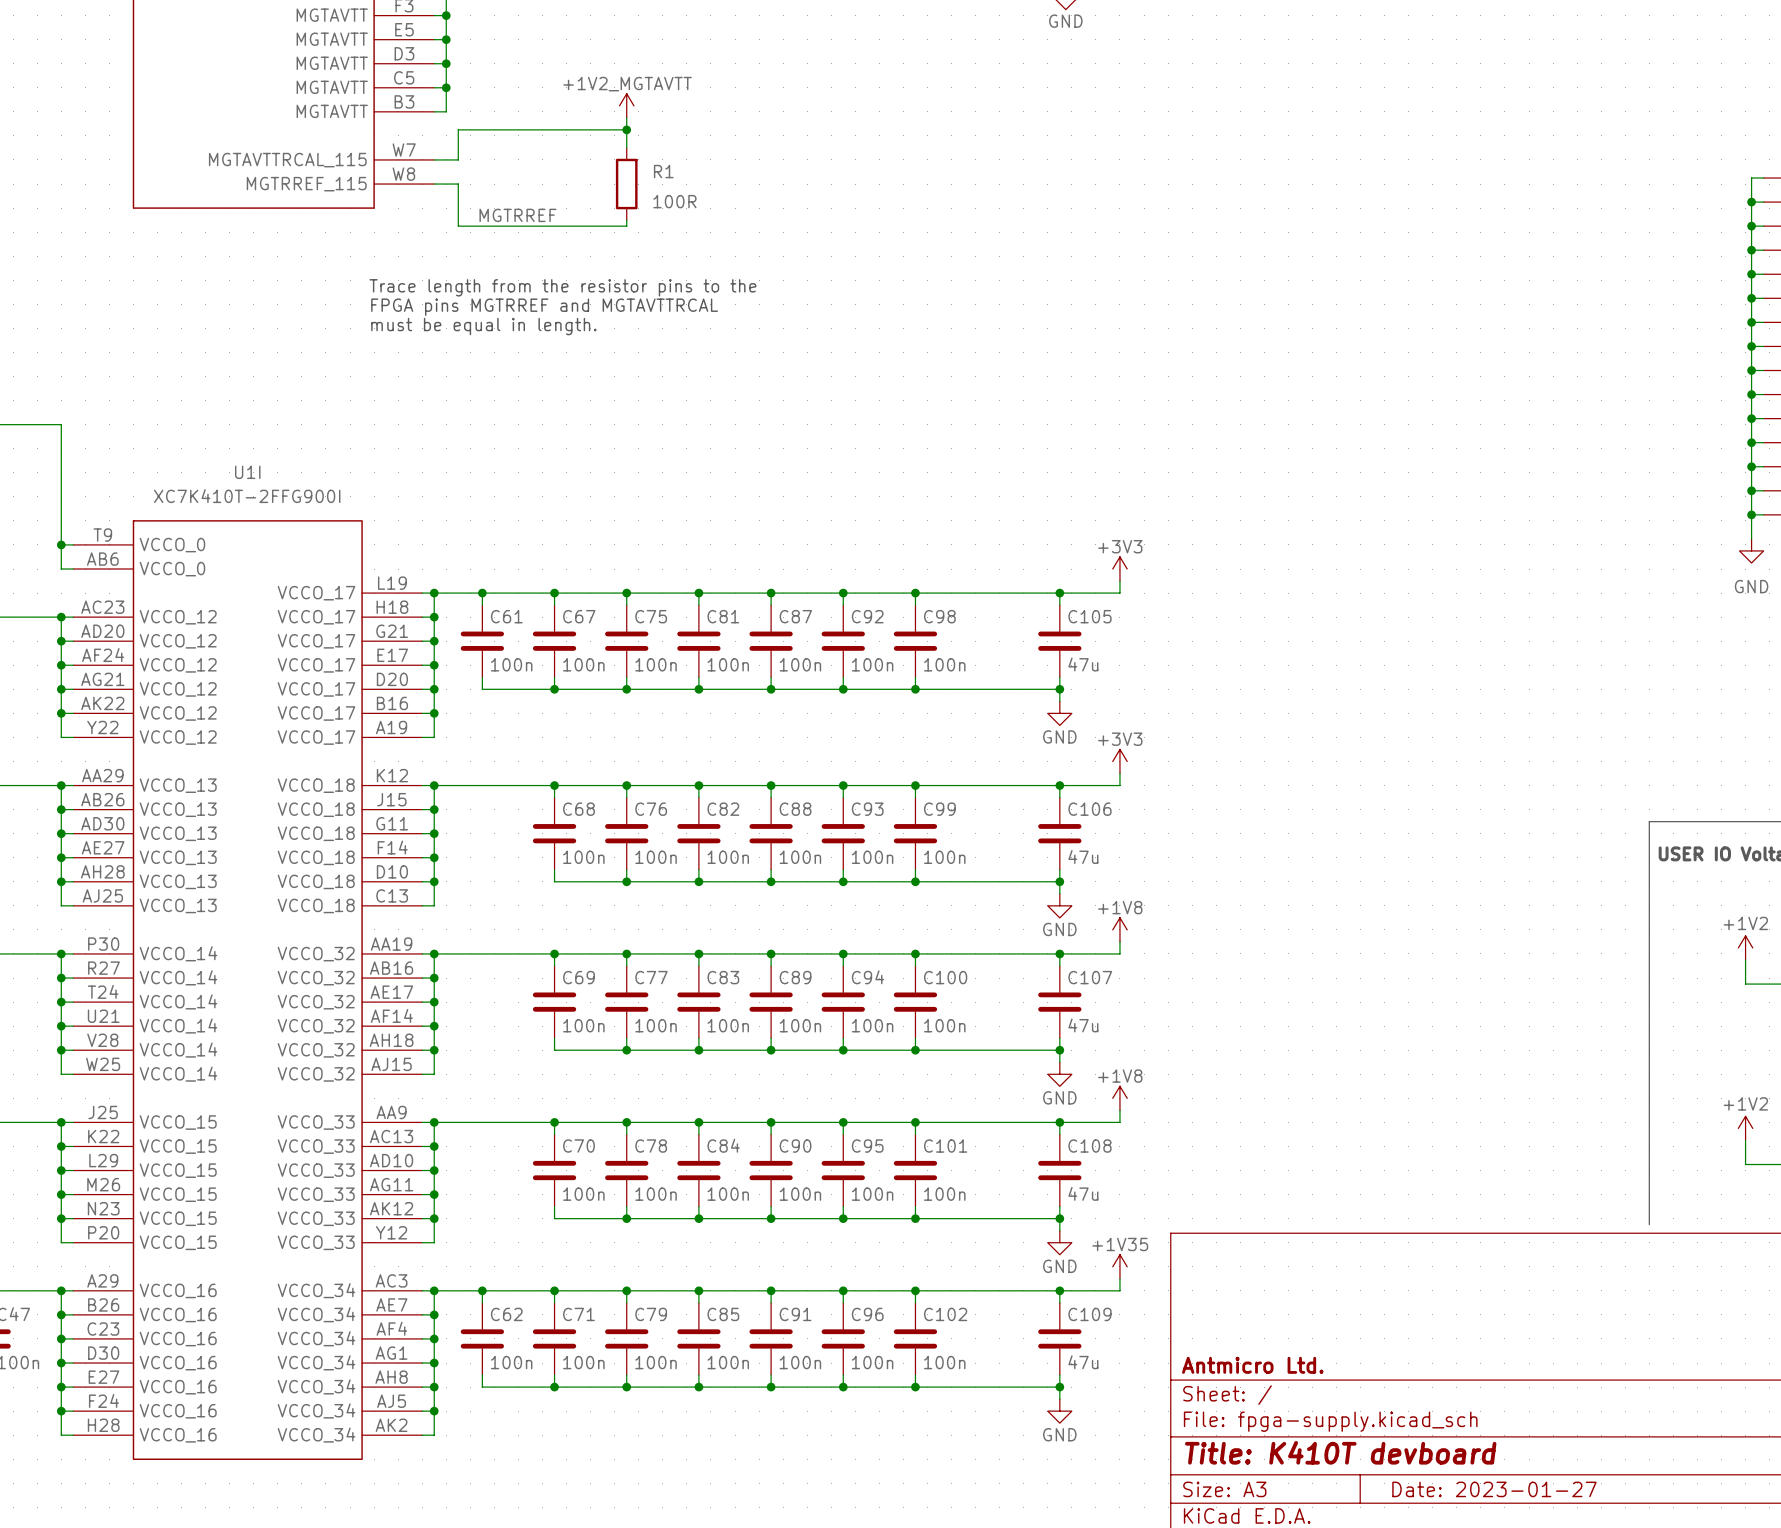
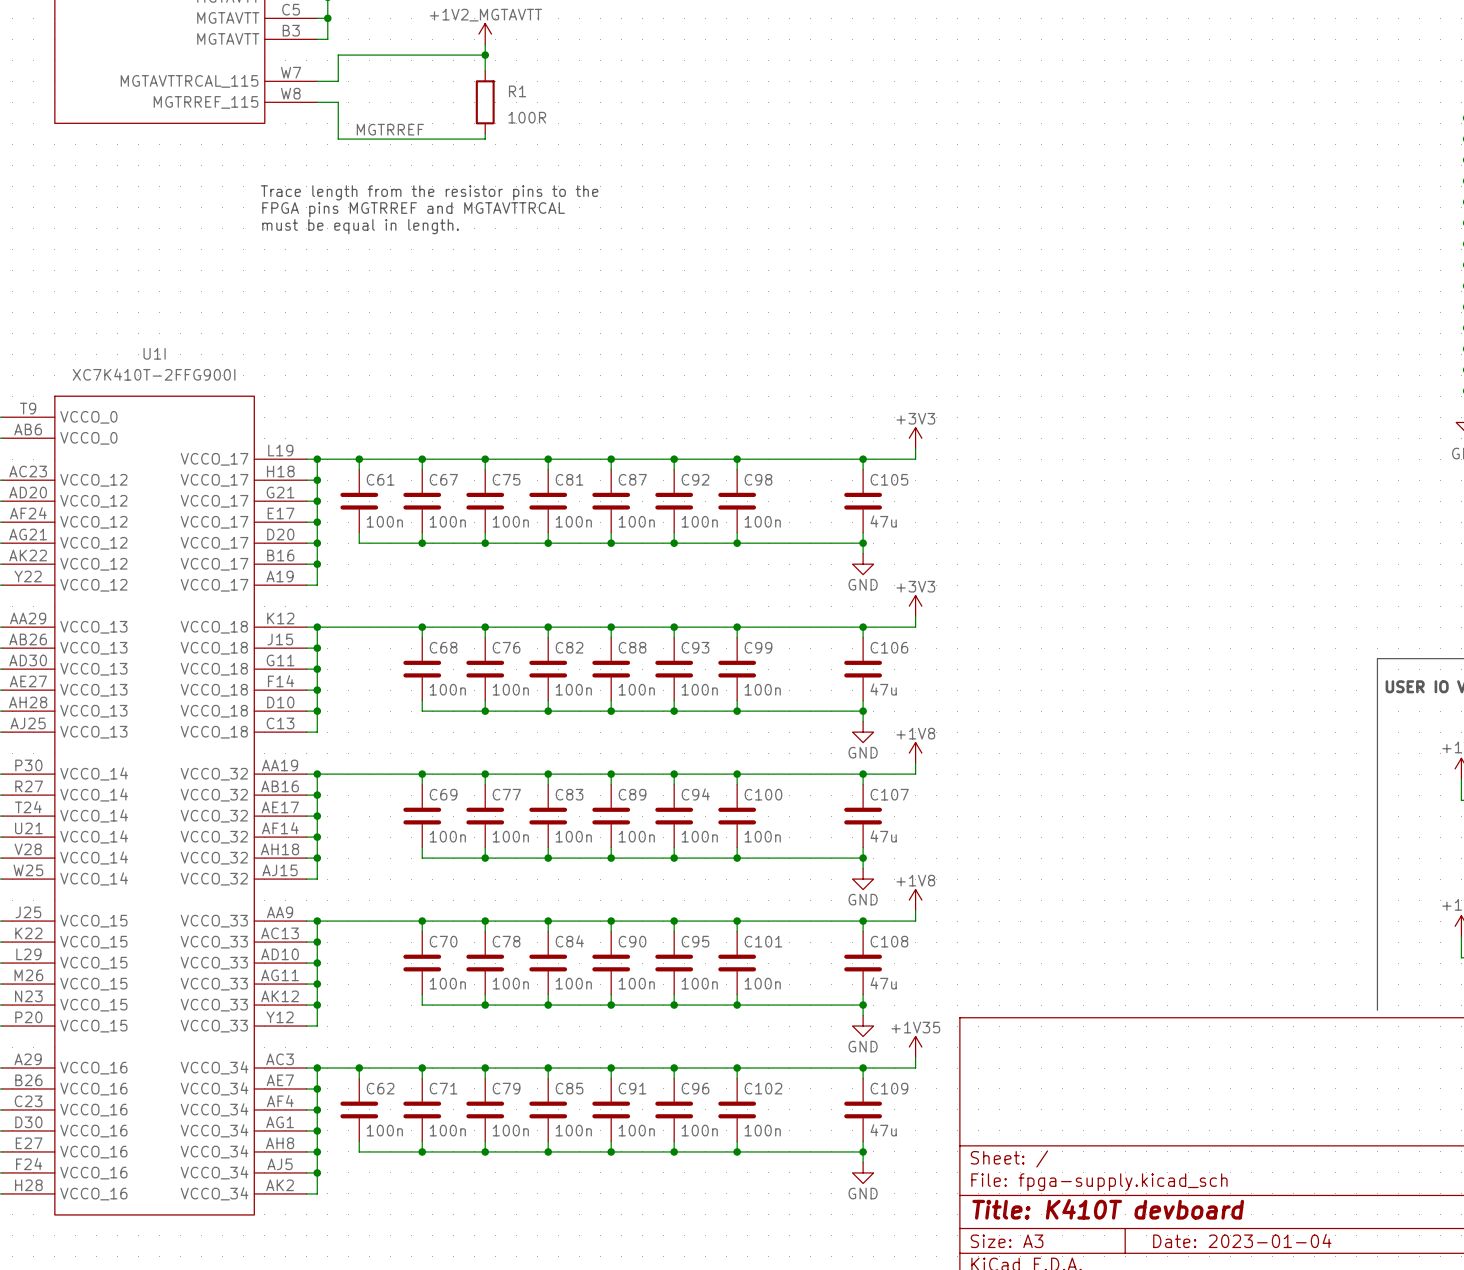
title block: Antmicro Ltd. (1252, 1365) -> none
title block: Date: 2023-01-27 (1494, 1489) -> Date: 2023-01-04 (1242, 1240)

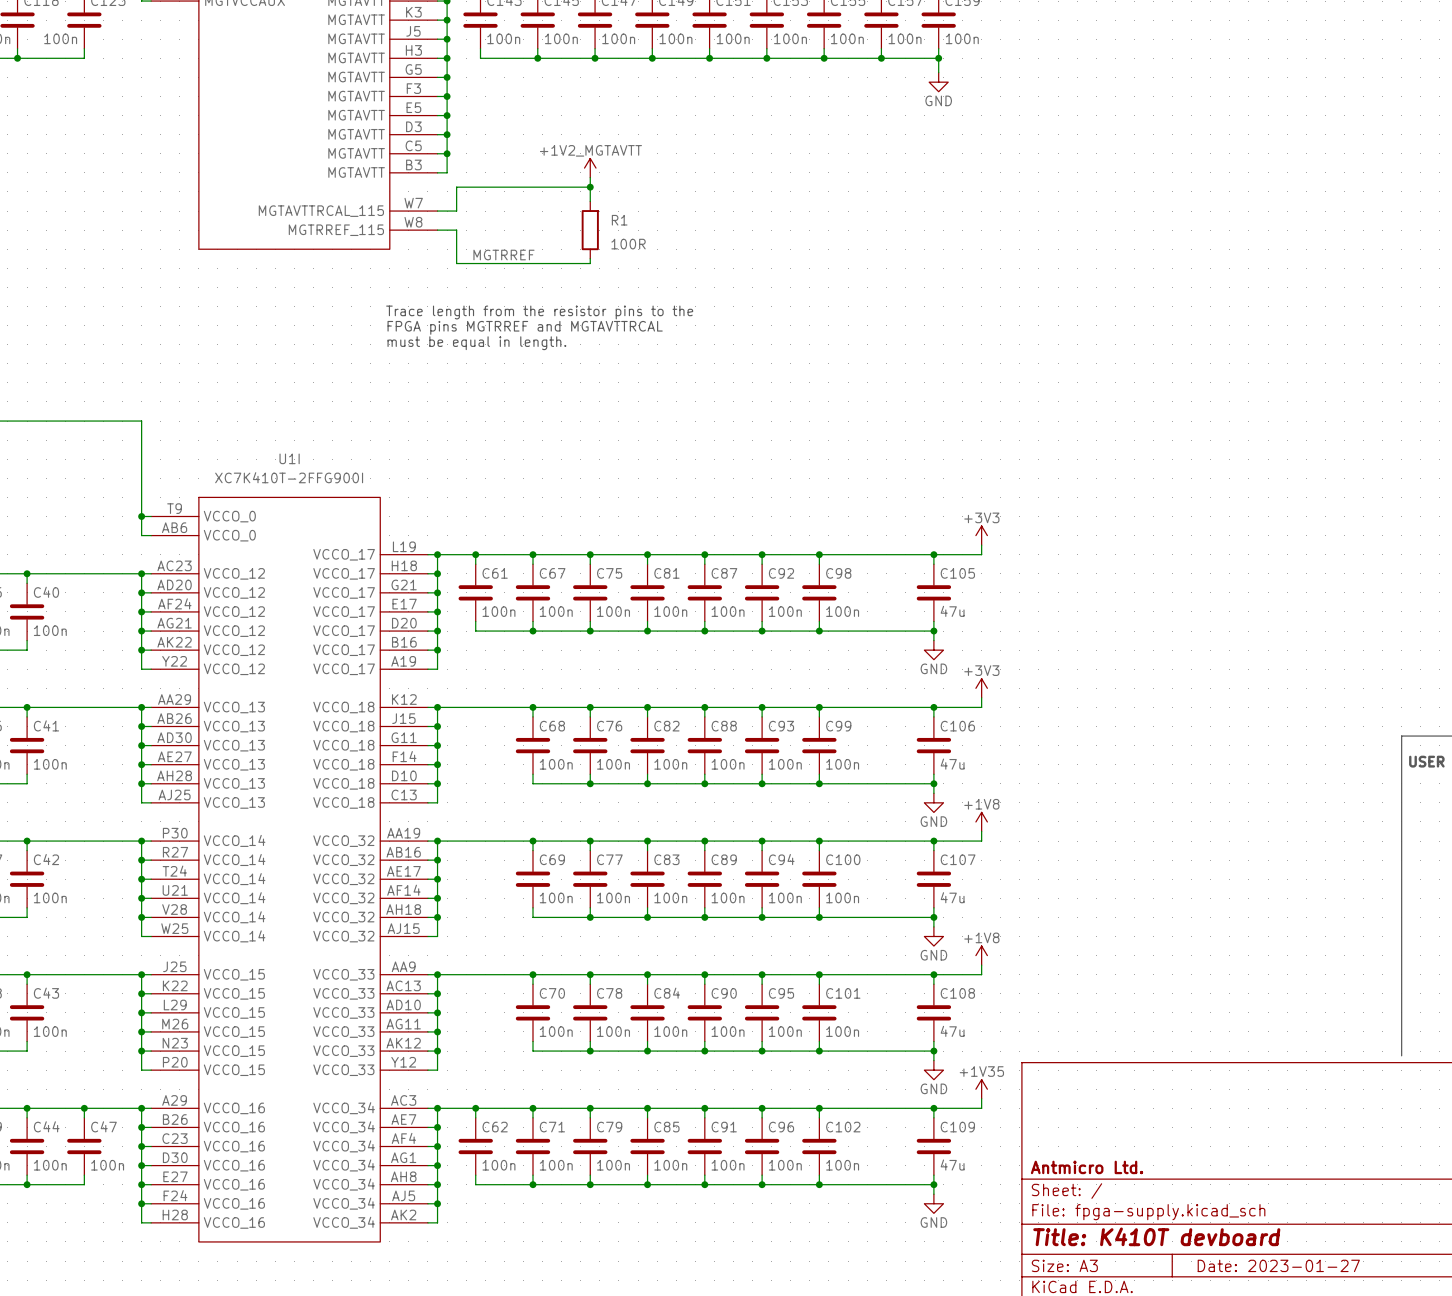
title block: none -> Antmicro Ltd. (1087, 1167)
title block: Date: 2023-01-04 (1242, 1240) -> Date: 2023-01-27 (1278, 1265)

